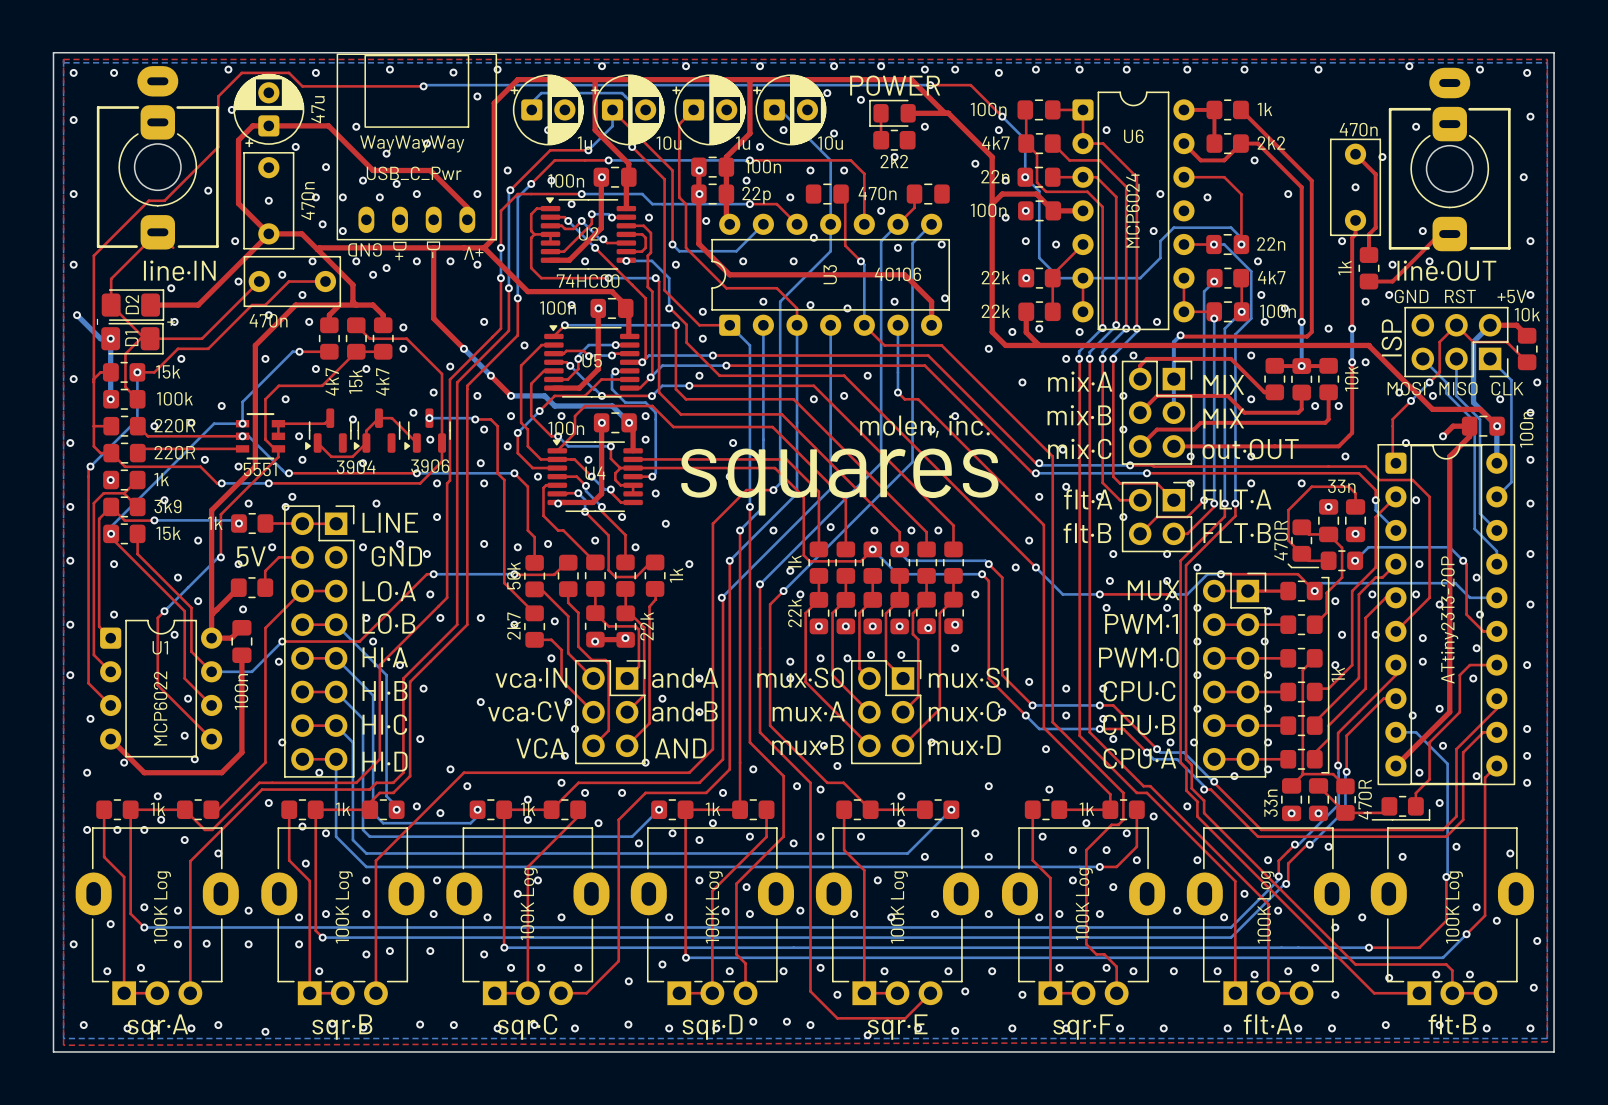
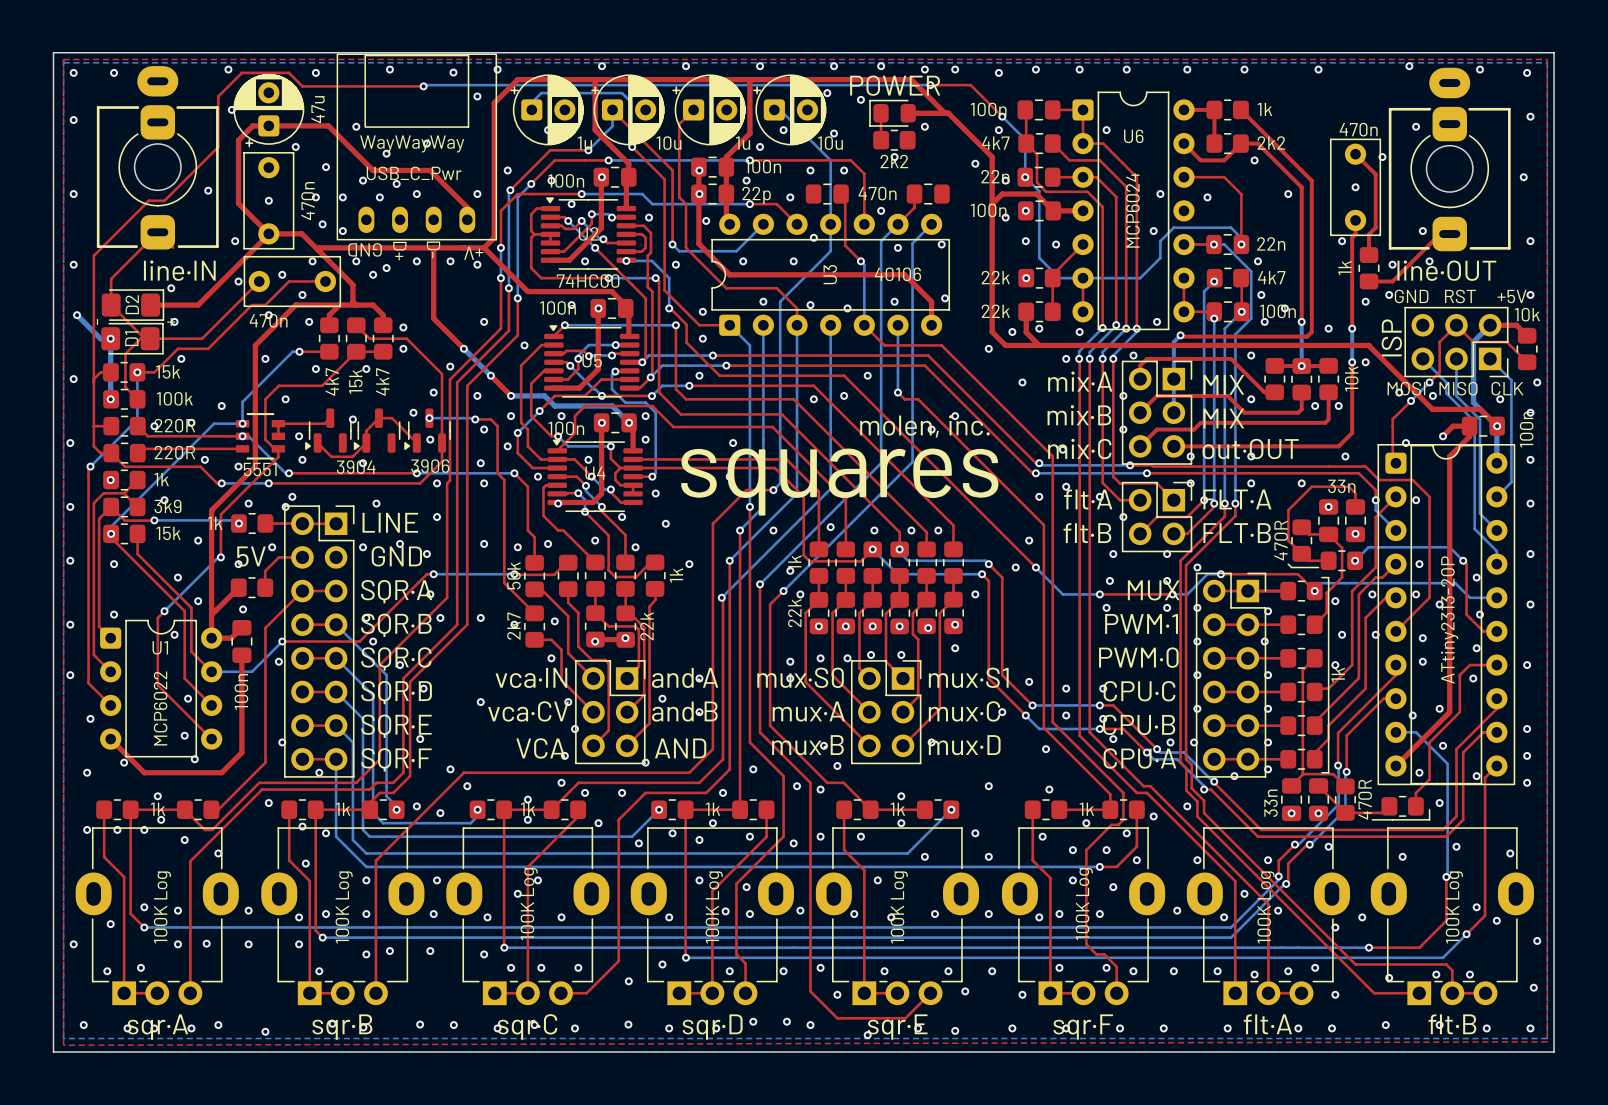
text: LO·A (389, 591) -> none
text: none -> SQR·A (396, 591)
text: LO·B (388, 623) -> none
text: none -> SQR·B (396, 625)
text: HI·A (385, 657) -> none
text: none -> SQR·C (396, 658)
text: HI·B (385, 690) -> none
text: none -> SQR·D (396, 692)
text: HI·C (384, 724) -> none
text: none -> SQR·E (396, 726)
text: none -> SQR·F (396, 759)
text: HI·D (385, 761) -> none

